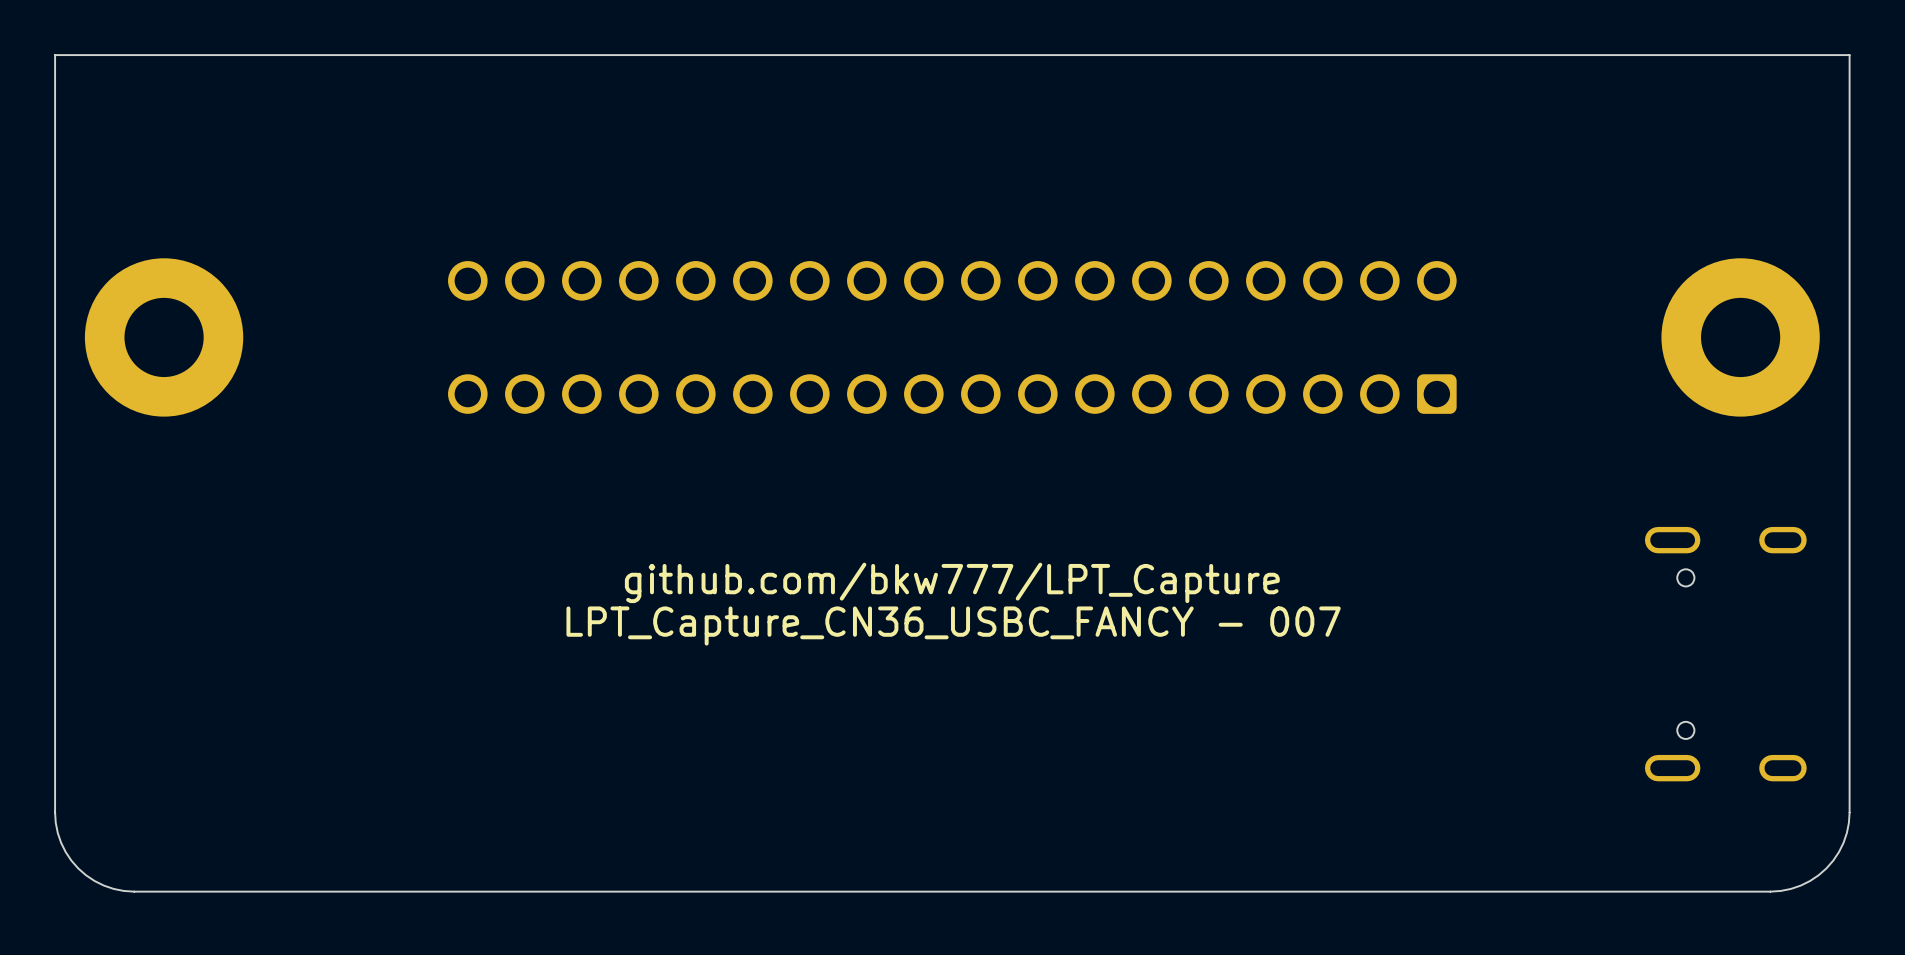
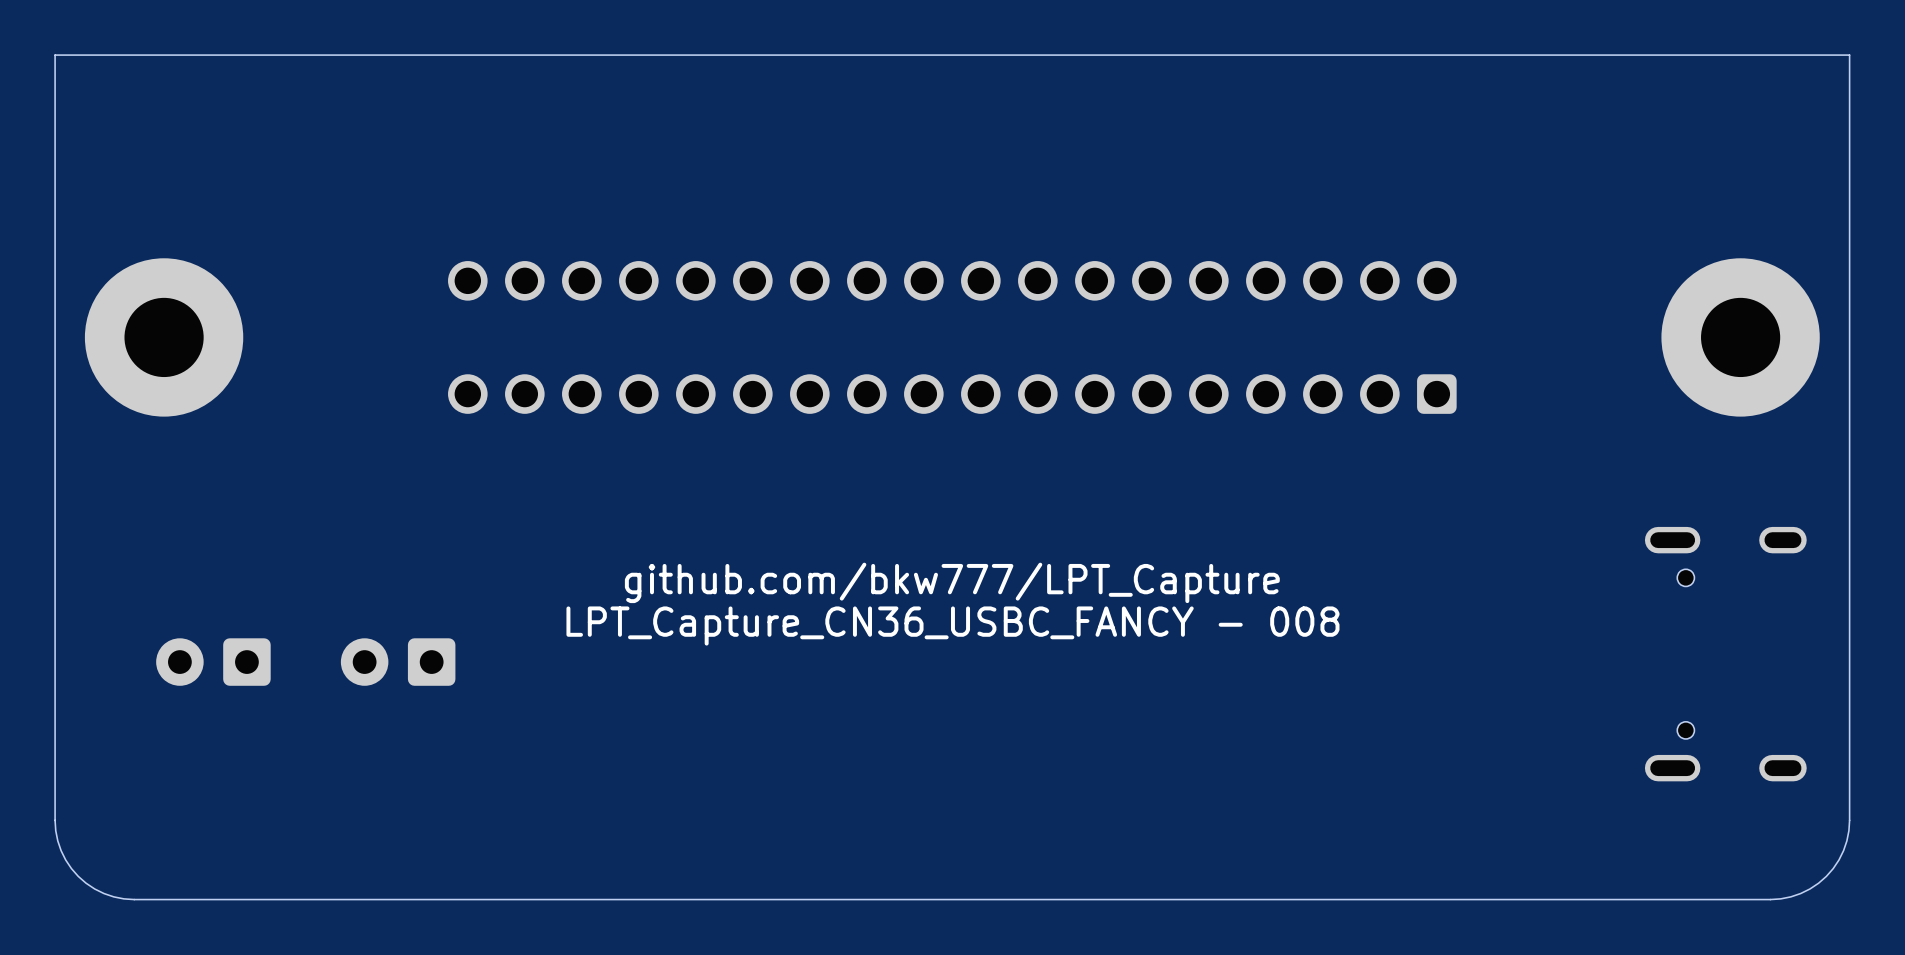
drawing: none -> [54, 54, 1851, 901]
board edge: (1849, 55) (1849, 812) (1846, 832) (1838, 852) (1818, 875) (1800, 885) (1770, 891) (134, 891) (113, 888) (94, 881) (78, 868) (61, 842) (55, 812) (55, 55) (1849, 55) -> none
text: LPT_Capture_CN36_USBC_FANCY - 007 (953, 626) -> LPT_Capture_CN36_USBC_FANCY - 008 (952, 626)
part: none -> (213, 662)
part: none -> (398, 662)

